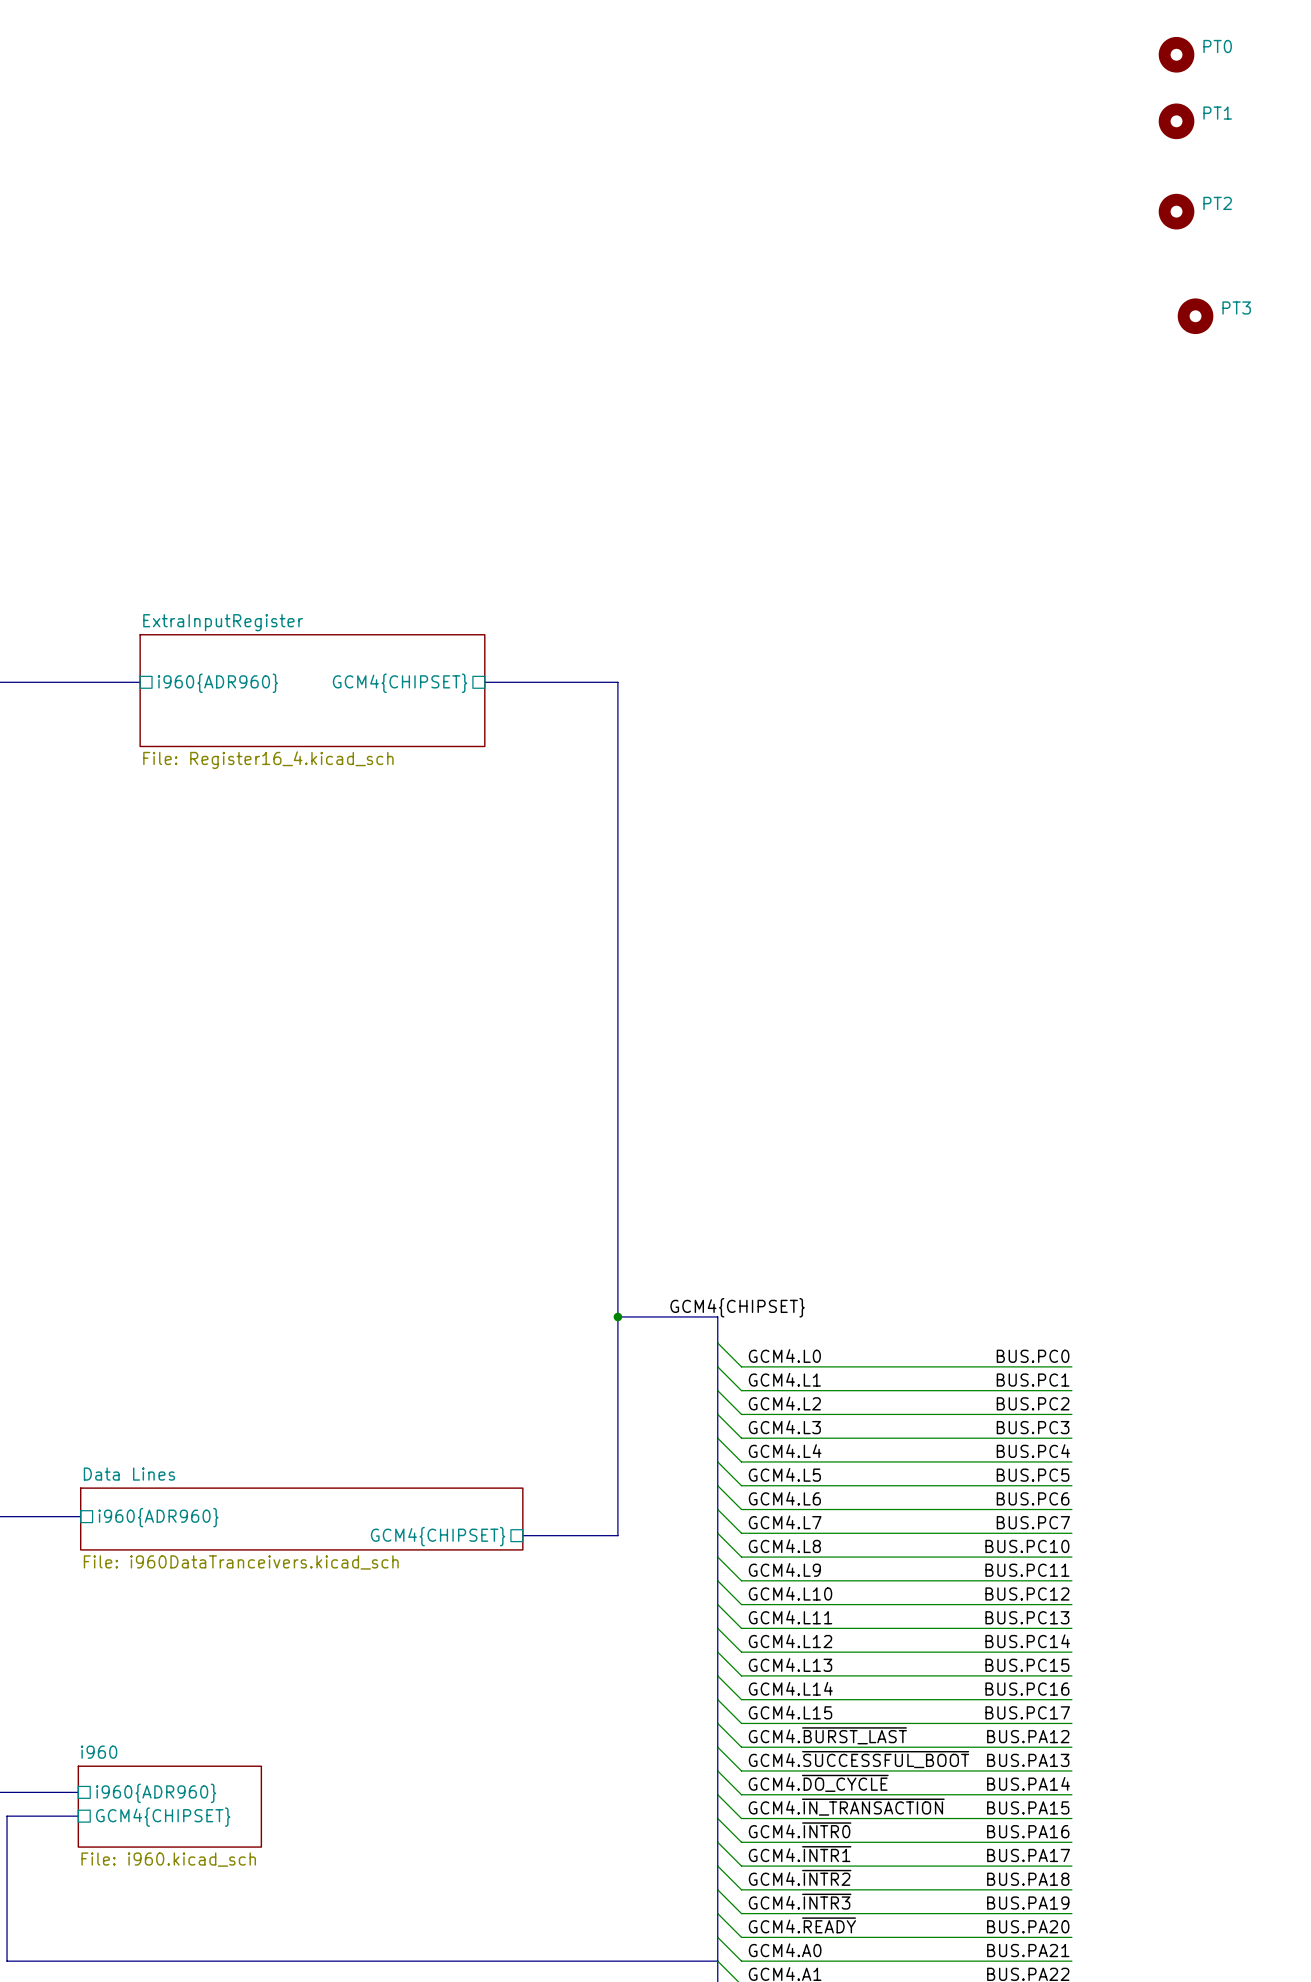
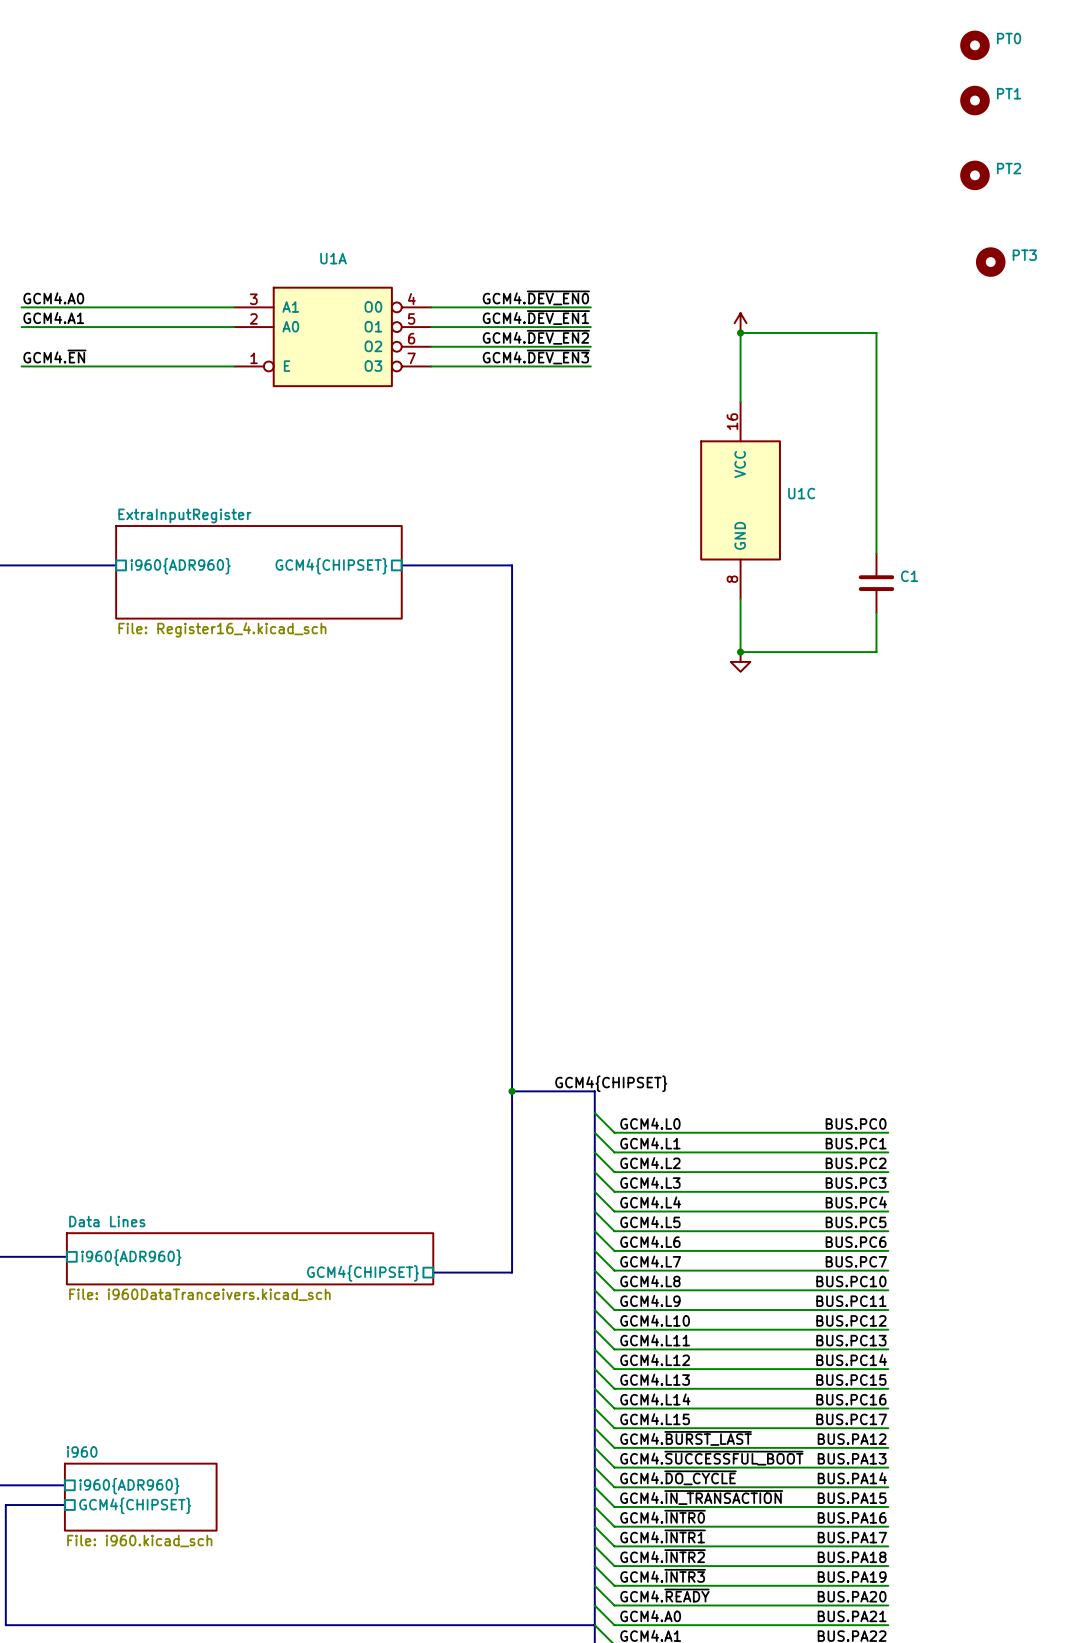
label: none -> GCM4.~{DEV_EN0} (536, 297)
label: none -> GCM4.A0 (53, 298)
wire: none -> (21, 307) (234, 307)
wire: none -> (431, 307) (590, 307)
label: none -> GCM4.A1 (53, 318)
label: none -> GCM4.~{DEV_EN1} (536, 317)
power symbol: none -> (740, 323)
wire: none -> (21, 327) (234, 327)
wire: none -> (431, 327) (590, 327)
junction: none -> (740, 332)
U1A: none -> (332, 336)
label: none -> GCM4.~{DEV_EN2} (536, 337)
wire: none -> (431, 346) (590, 346)
label: none -> GCM4.~{EN} (54, 356)
label: none -> GCM4.~{DEV_EN3} (536, 357)
wire: none -> (21, 366) (234, 366)
wire: none -> (431, 366) (590, 366)
wire: none -> (740, 401) (740, 332) (876, 332) (876, 553)
U1C: none -> (740, 500)
C1: none -> (876, 583)
wire: none -> (740, 598) (740, 652) (876, 652) (876, 612)
junction: none -> (740, 652)
power symbol: none -> (740, 661)

